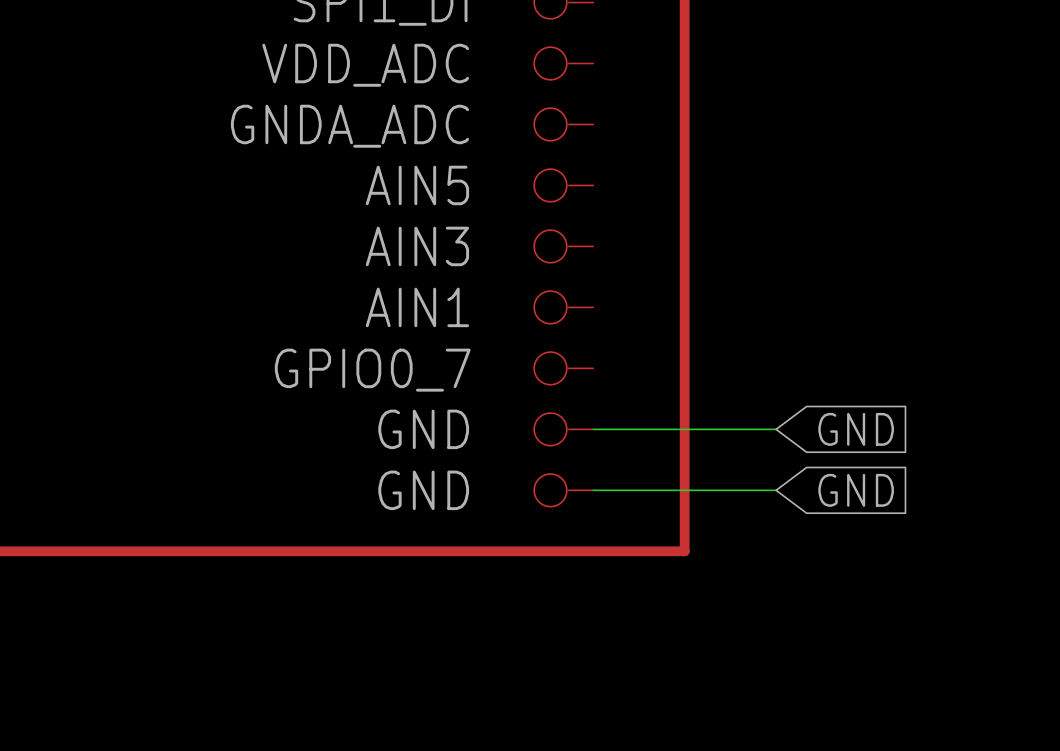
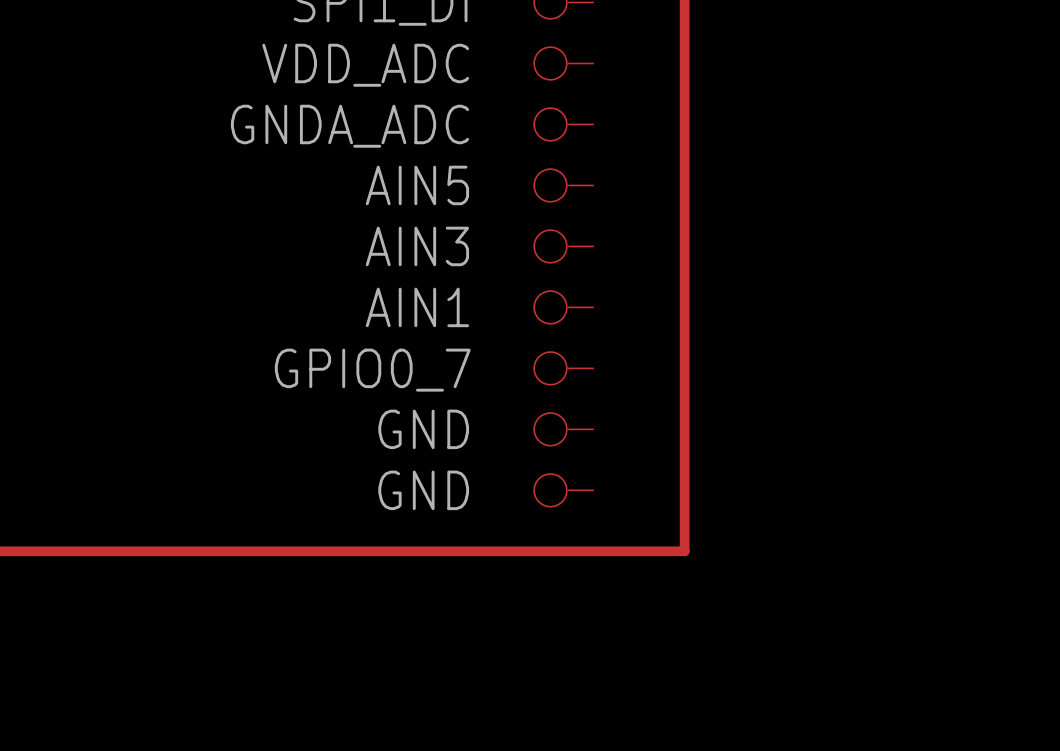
wire: (593, 429) (776, 429) -> none
global label: GND (856, 429) -> none
wire: (593, 490) (776, 490) -> none
global label: GND (856, 490) -> none

